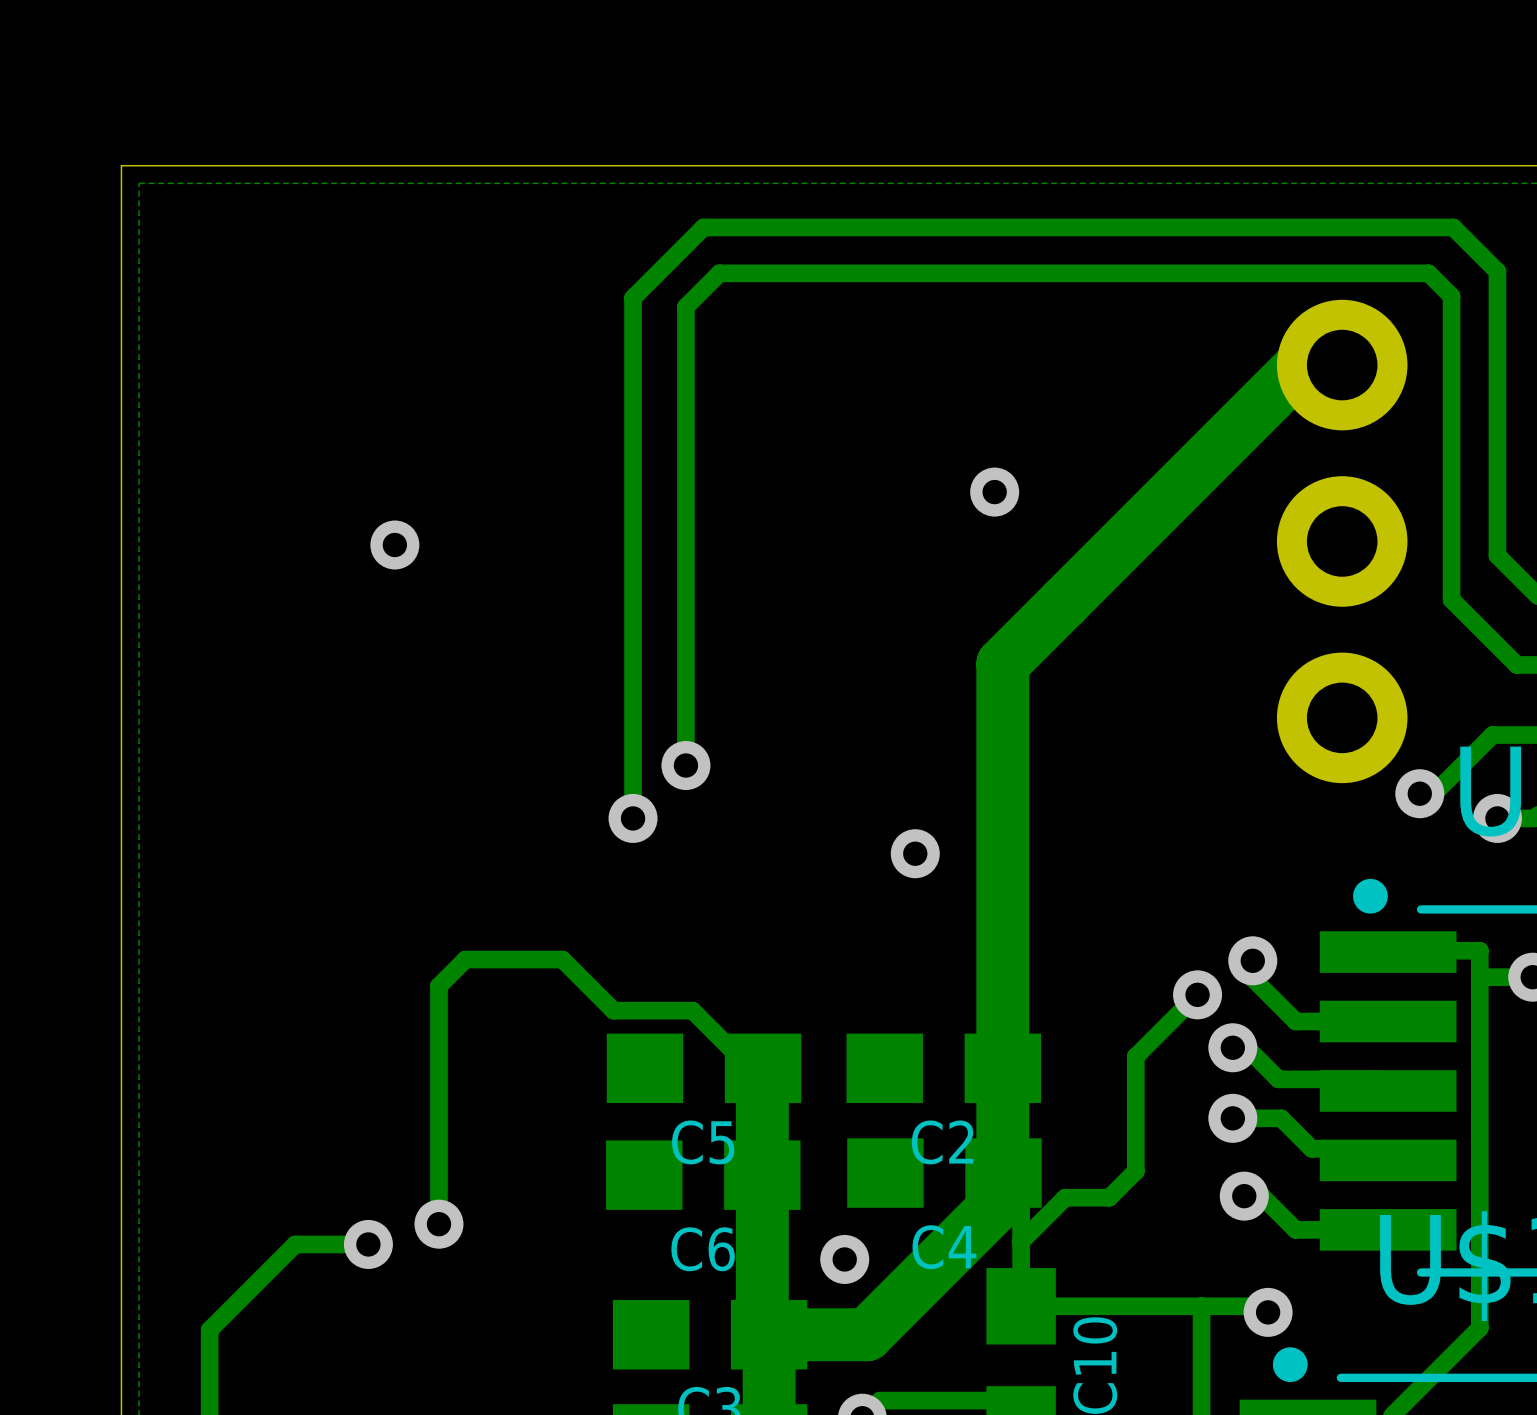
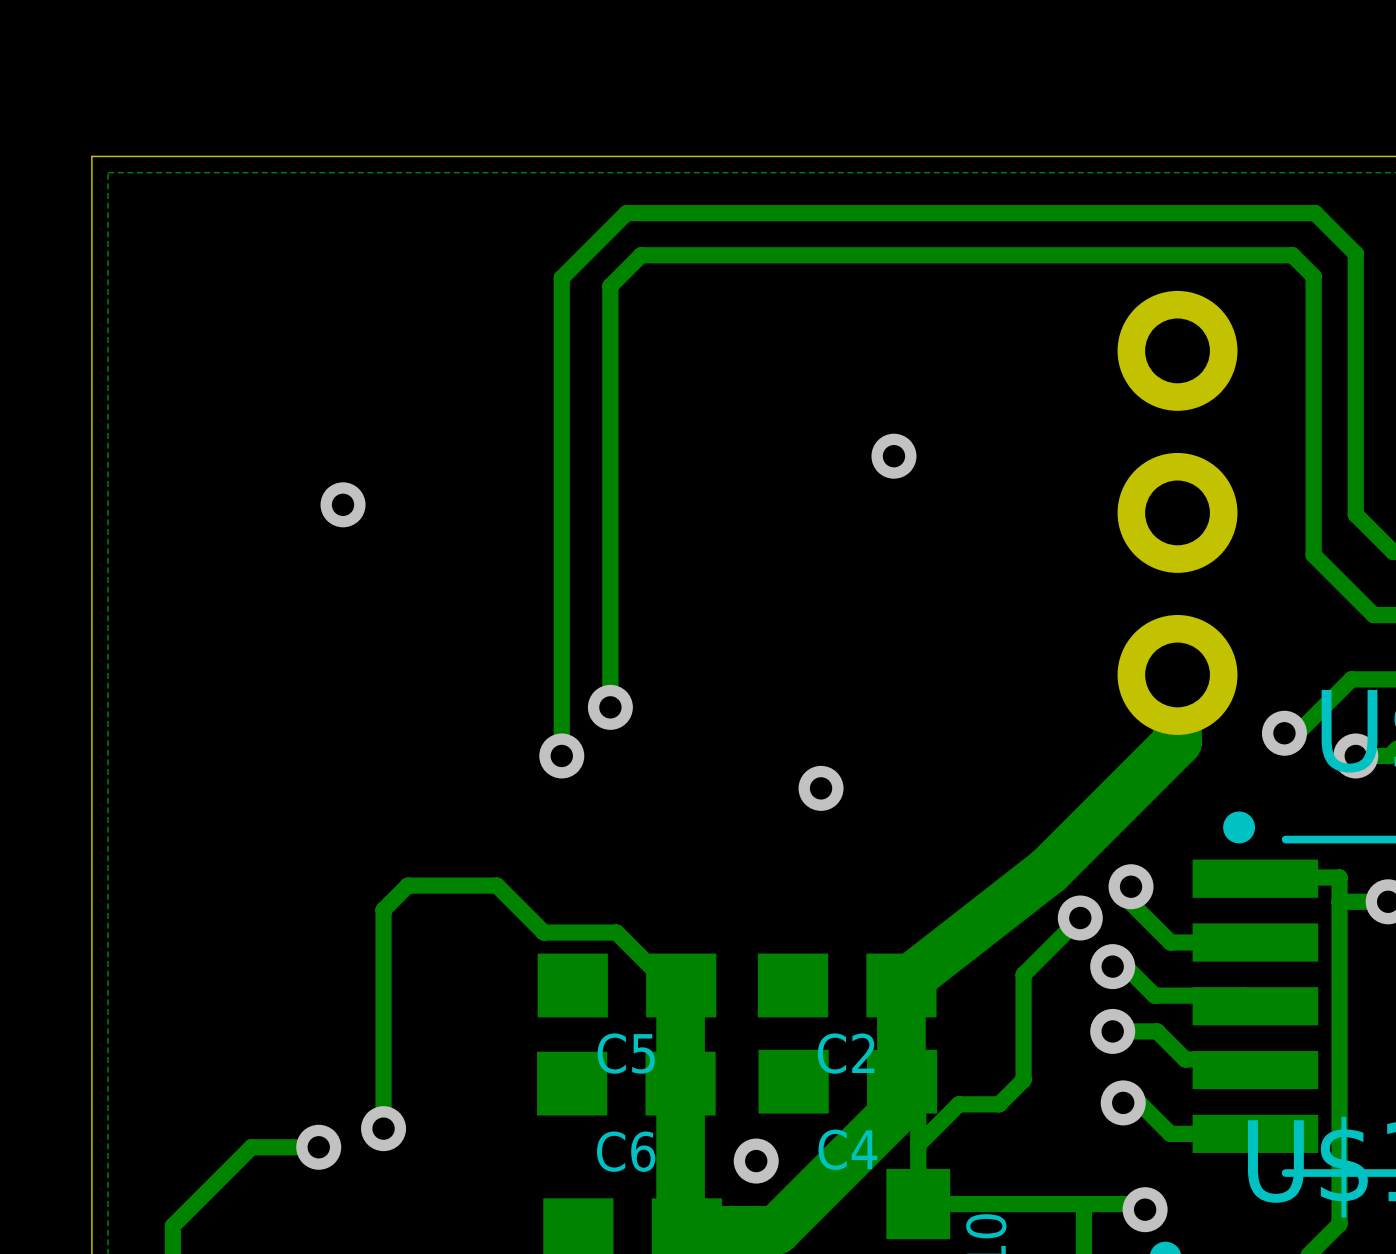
track: (1342, 365) (1301, 365) (1002, 663) (1002, 1068) -> (1177, 674) (1177, 741) (1048, 870) (901, 985)
part position: (1342, 541) -> (1177, 512)

